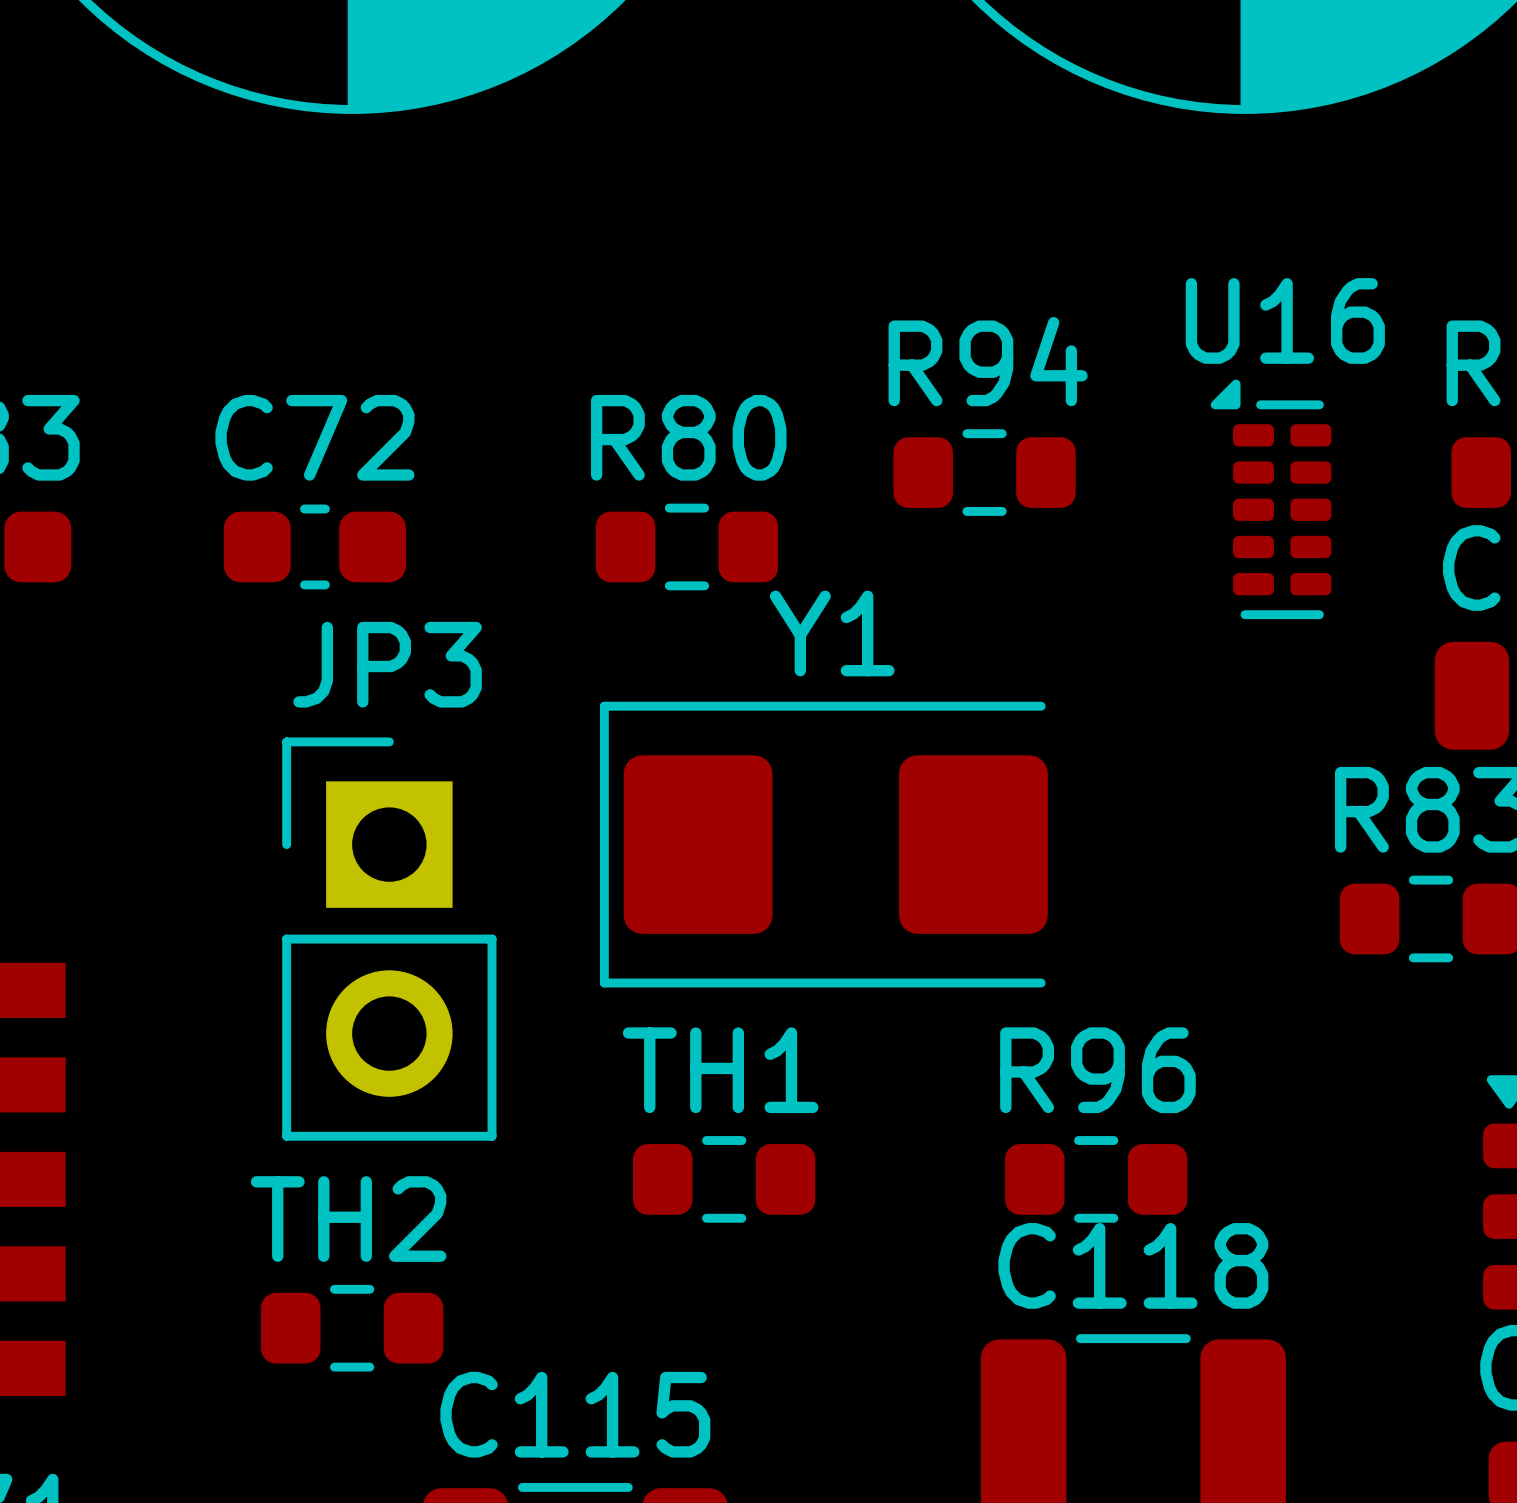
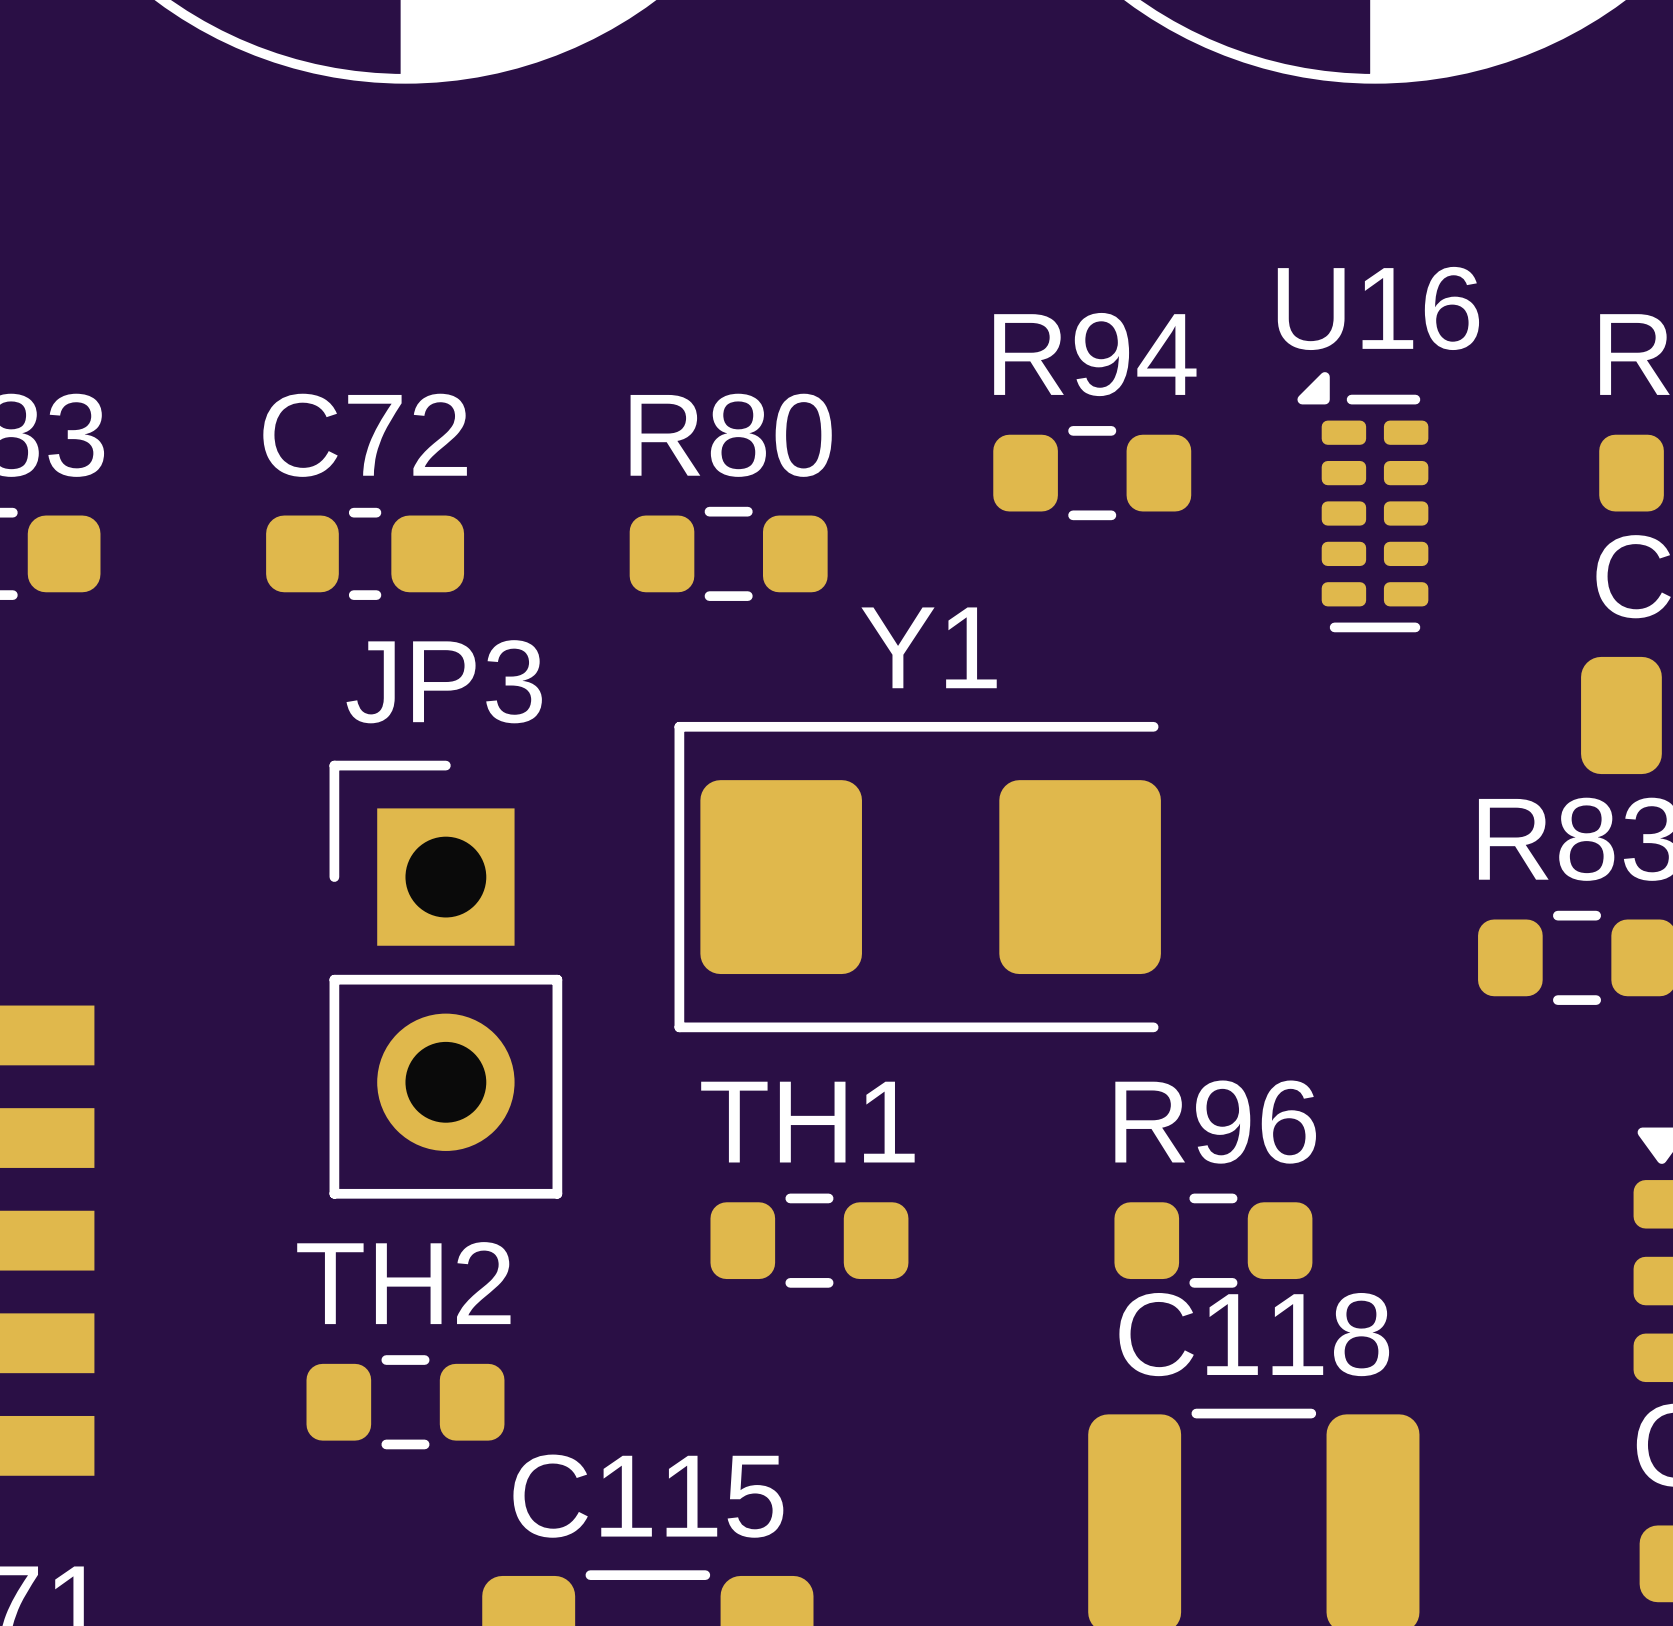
U16 position: (1271, 499) -> (1362, 502)
R80 position: (686, 546) -> (728, 553)

